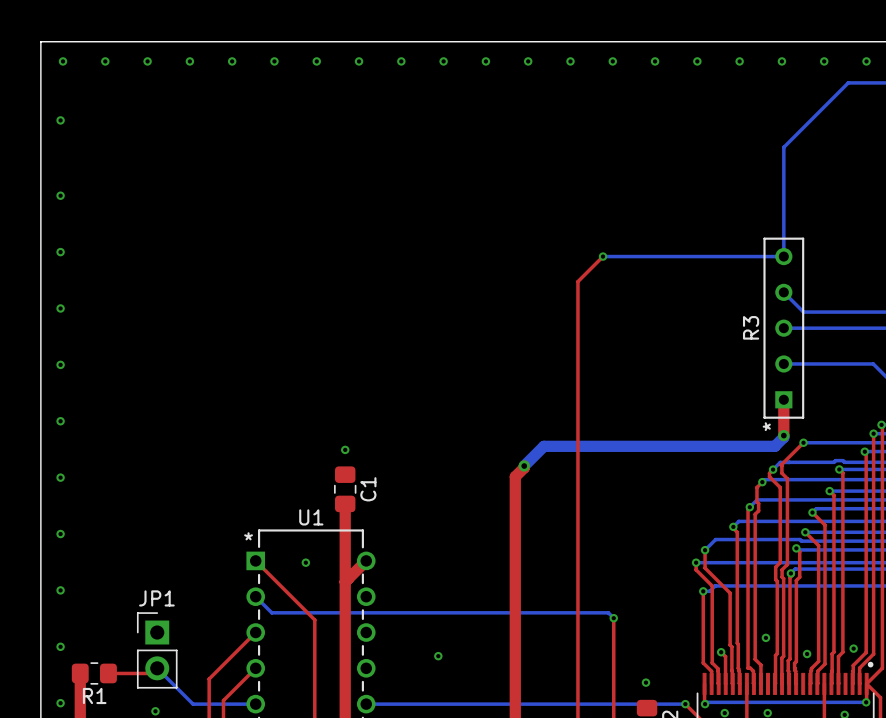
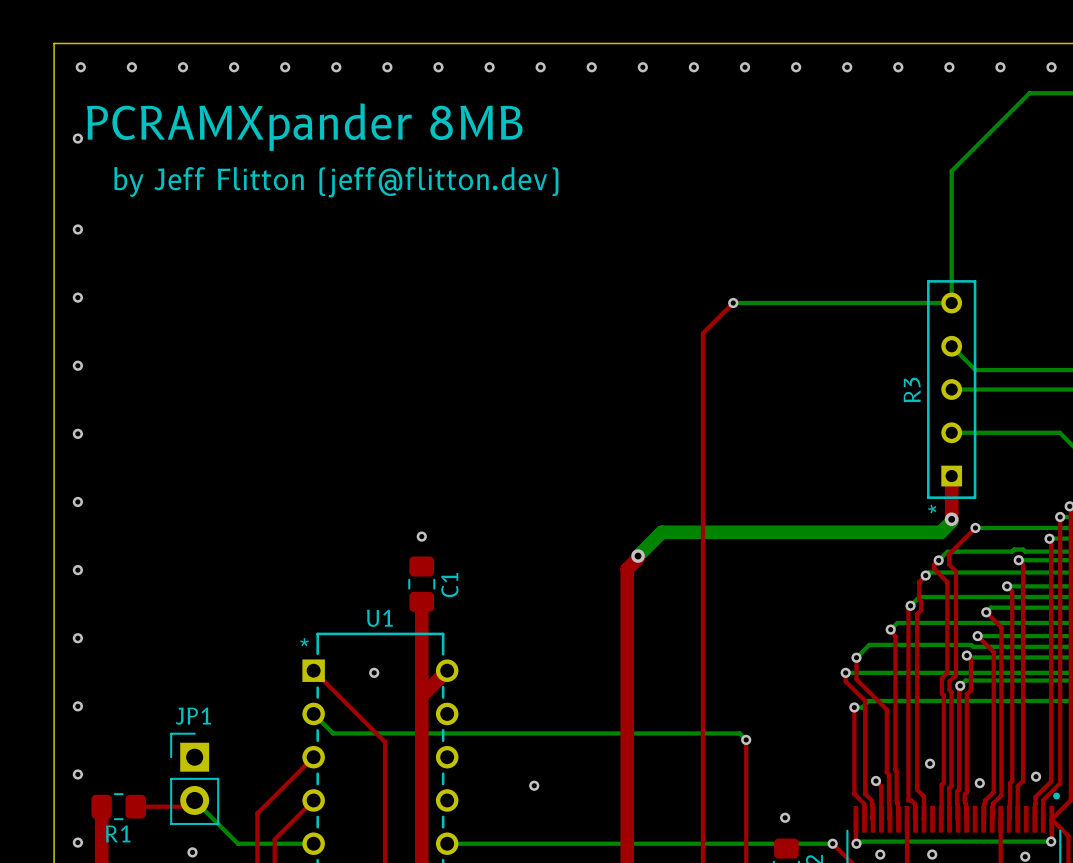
text: none -> PCRAMXpander 8MB (304, 127)
text: none -> by Jeff Flitton (jeff@flitton.dev) (336, 182)

